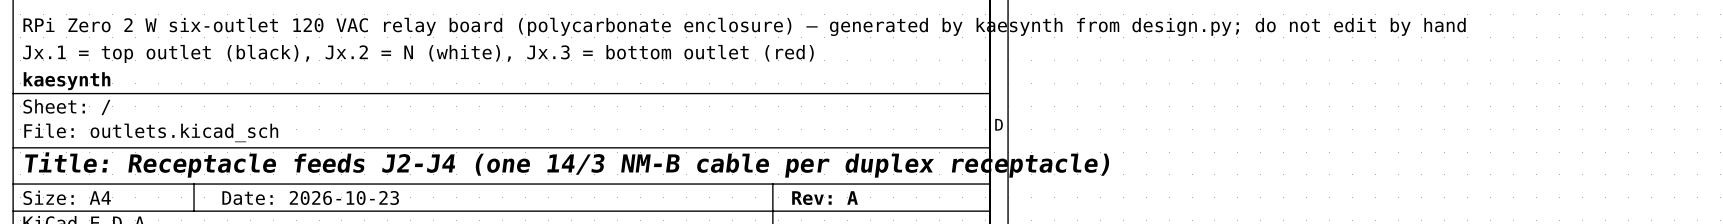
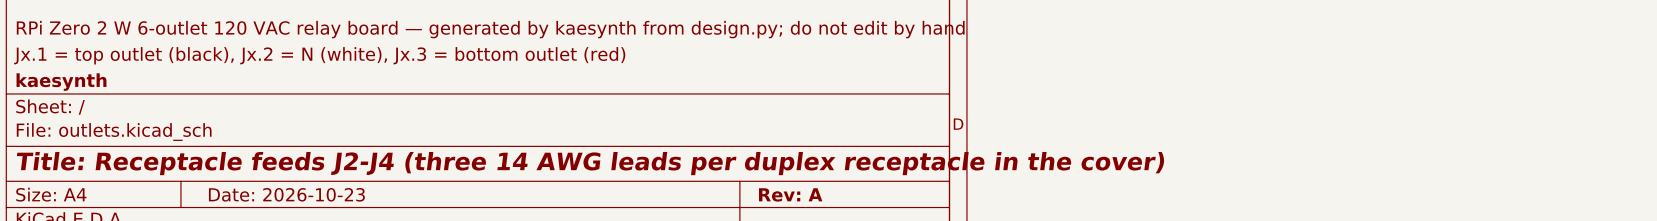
title block: RPi Zero 2 W six-outlet 120 VAC relay board (polycarbonate enclosure) — generated by kaesynth from design.py; do not edit by hand (744, 26) -> RPi Zero 2 W 6-outlet 120 VAC relay board — generated by kaesynth from design.py; do not edit by hand (490, 29)
title block: Title: Receptacle feeds J2-J4 (one 14/3 NM-B cable per duplex receptacle) (567, 164) -> Title: Receptacle feeds J2-J4 (three 14 AWG leads per duplex receptacle in the cover) (590, 163)

